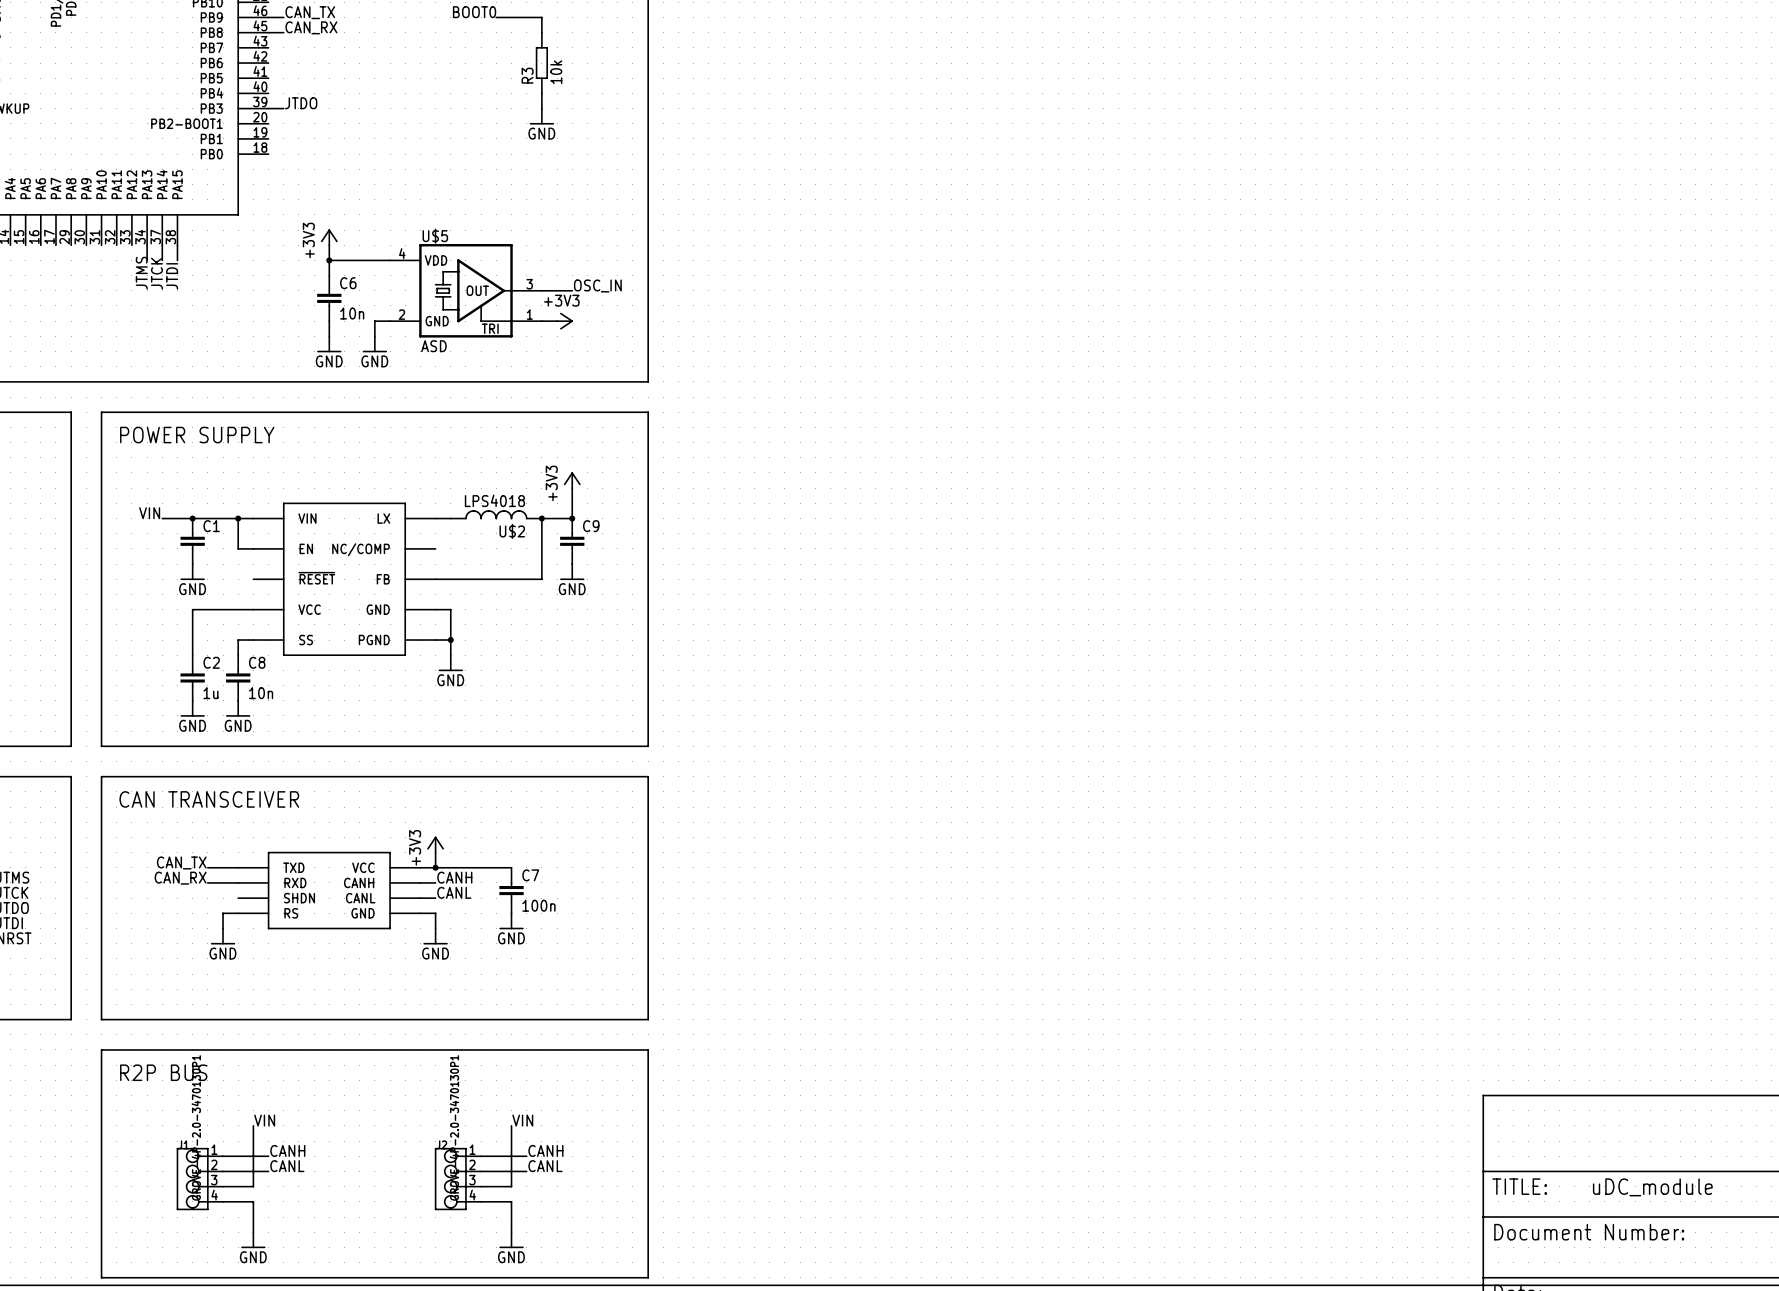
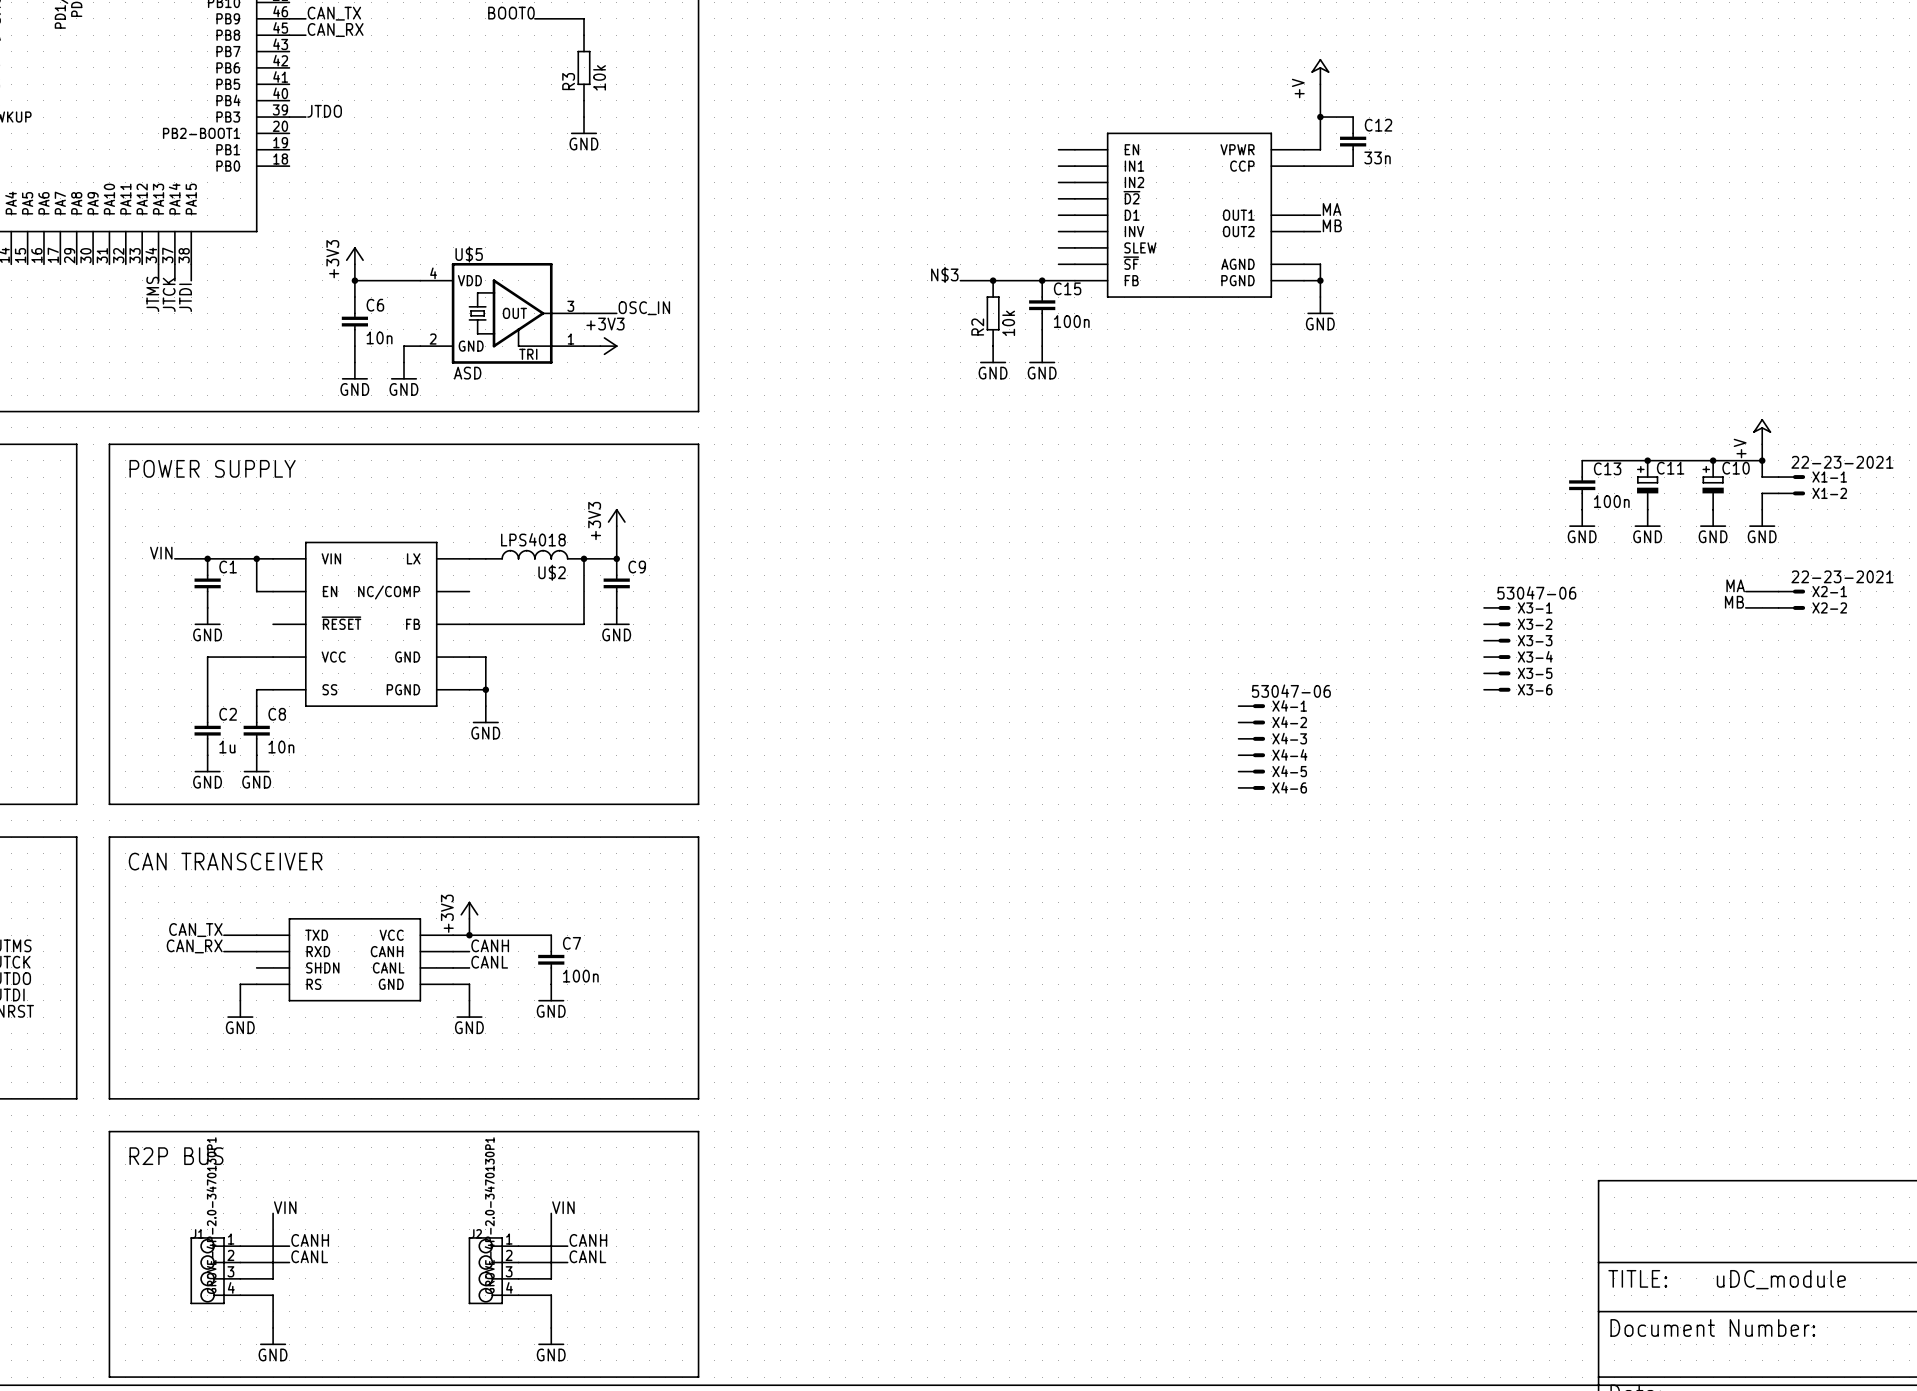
power symbol: none -> +V (1320, 71)
wire: none -> (1320, 84) (1320, 149) (1304, 149)
wire: none -> (1320, 117) (1353, 117)
junction: none -> (1320, 117)
C12: none -> 33n (1353, 141)
wire: none -> (1058, 149) (1074, 149)
wire: none -> (1058, 166) (1074, 166)
wire: none -> (1304, 166) (1353, 166)
wire: none -> (1058, 182) (1074, 182)
wire: none -> (1058, 198) (1074, 198)
label: none -> MA (1332, 209)
wire: none -> (1058, 215) (1074, 215)
part: none -> (1189, 215)
wire: none -> (1304, 215) (1320, 215)
label: none -> MB (1332, 225)
wire: none -> (1058, 231) (1074, 231)
wire: none -> (1304, 231) (1320, 231)
wire: none -> (1058, 247) (1074, 247)
wire: none -> (1058, 264) (1074, 264)
wire: none -> (1304, 264) (1320, 264) (1320, 297)
label: none -> N$3 (944, 274)
wire: none -> (960, 280) (1074, 280)
junction: none -> (993, 280)
junction: none -> (1042, 280)
wire: none -> (1304, 280) (1320, 280)
junction: none -> (1320, 280)
C15: none -> 100n (1042, 305)
power symbol: none -> GND (1320, 305)
R2: none -> 10k (993, 313)
wire: none -> (1042, 329) (1042, 346)
power symbol: none -> GND (993, 354)
power symbol: none -> GND (1042, 354)
power symbol: none -> +V (1762, 431)
wire: none -> (1762, 444) (1762, 477) (1778, 477)
wire: none -> (1582, 460) (1762, 460)
junction: none -> (1647, 460)
junction: none -> (1713, 460)
junction: none -> (1762, 460)
X1-1: none -> 22-23-2021 (1791, 477)
C13: none -> 100n (1582, 485)
C11: none -> (1647, 485)
C10: none -> (1713, 485)
wire: none -> (1778, 493) (1762, 493) (1762, 509)
X1-2: none -> (1791, 493)
power symbol: none -> GND (1582, 518)
power symbol: none -> GND (1647, 518)
power symbol: none -> GND (1713, 518)
power symbol: none -> GND (1762, 518)
label: none -> MA (1735, 585)
wire: none -> (1745, 591) (1778, 591)
X2-1: none -> 22-23-2021 (1791, 591)
label: none -> MB (1734, 602)
X3-1: none -> 53047-06 (1497, 607)
wire: none -> (1745, 607) (1778, 607)
X2-2: none -> (1791, 607)
X3-2: none -> (1497, 624)
X3-3: none -> (1497, 640)
X3-4: none -> (1497, 657)
X3-5: none -> (1497, 673)
X3-6: none -> (1497, 689)
X4-1: none -> 53047-06 (1251, 706)
X4-2: none -> (1251, 722)
X4-3: none -> (1251, 738)
X4-4: none -> (1251, 755)
X4-5: none -> (1251, 771)
X4-6: none -> (1251, 787)

